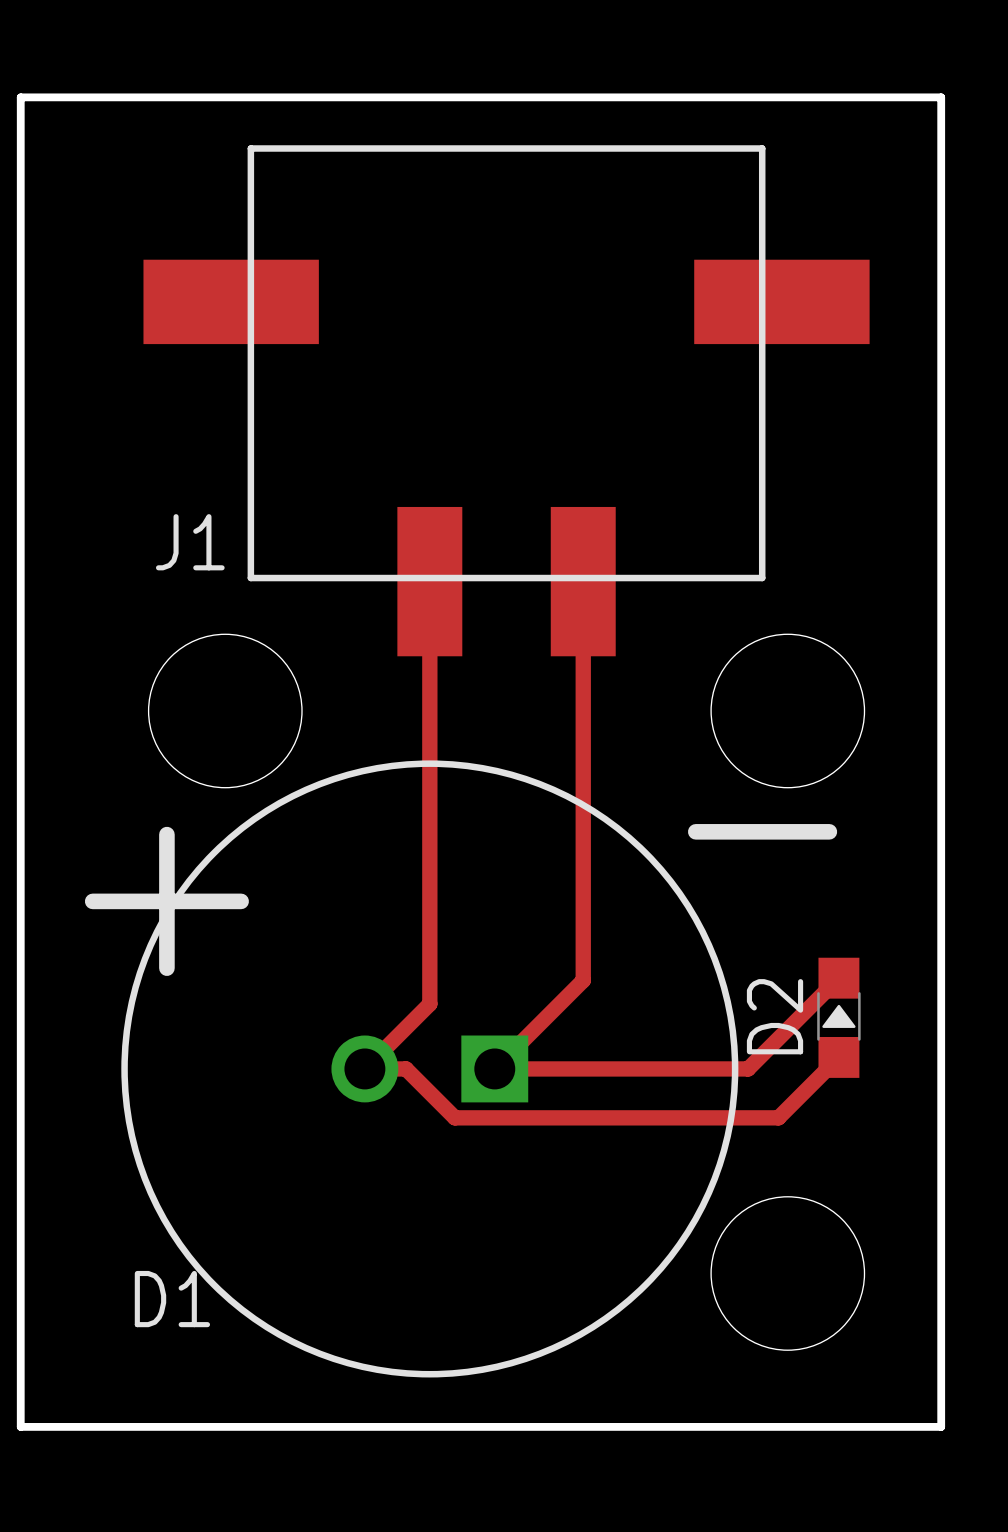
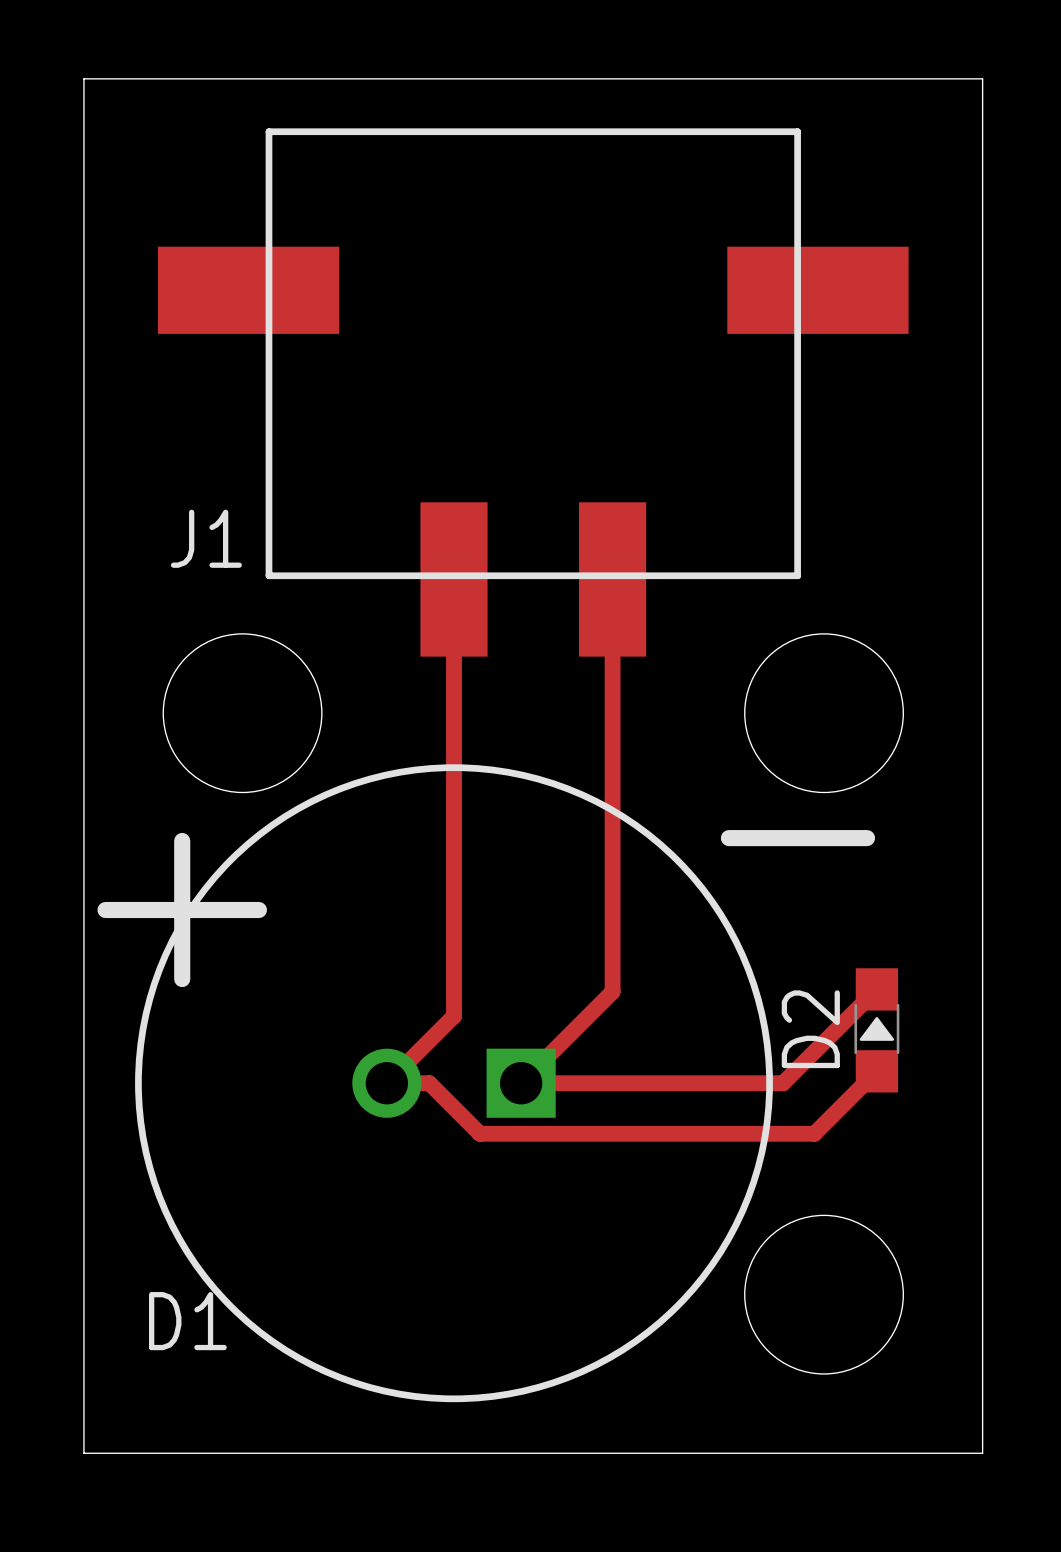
board edge: (71, 97) (20, 97) (20, 1426) (71, 1426) -> (83, 78) (83, 1453)
board edge width: thick (71, 97) (941, 97) (941, 1426) (71, 1426) -> thin (83, 78) (982, 78) (982, 1453) (83, 1453)

